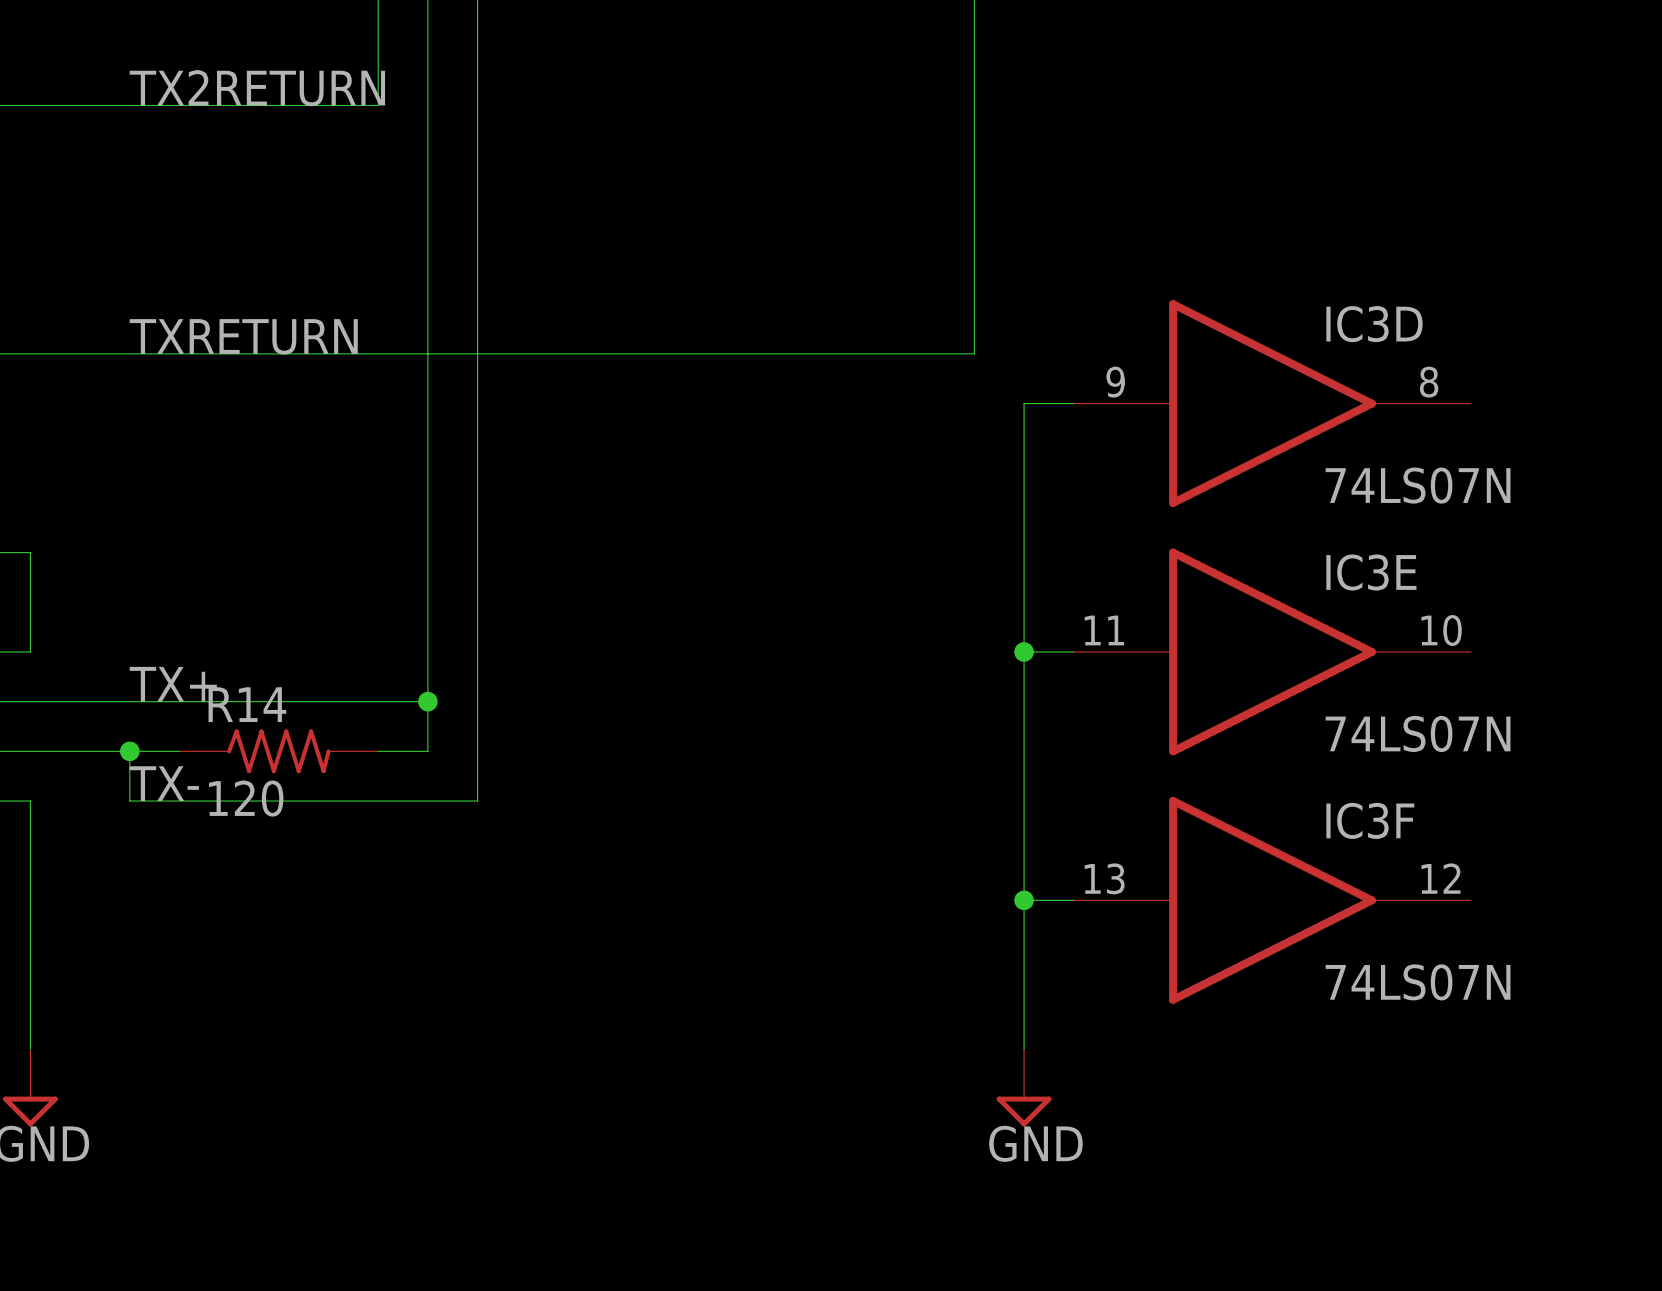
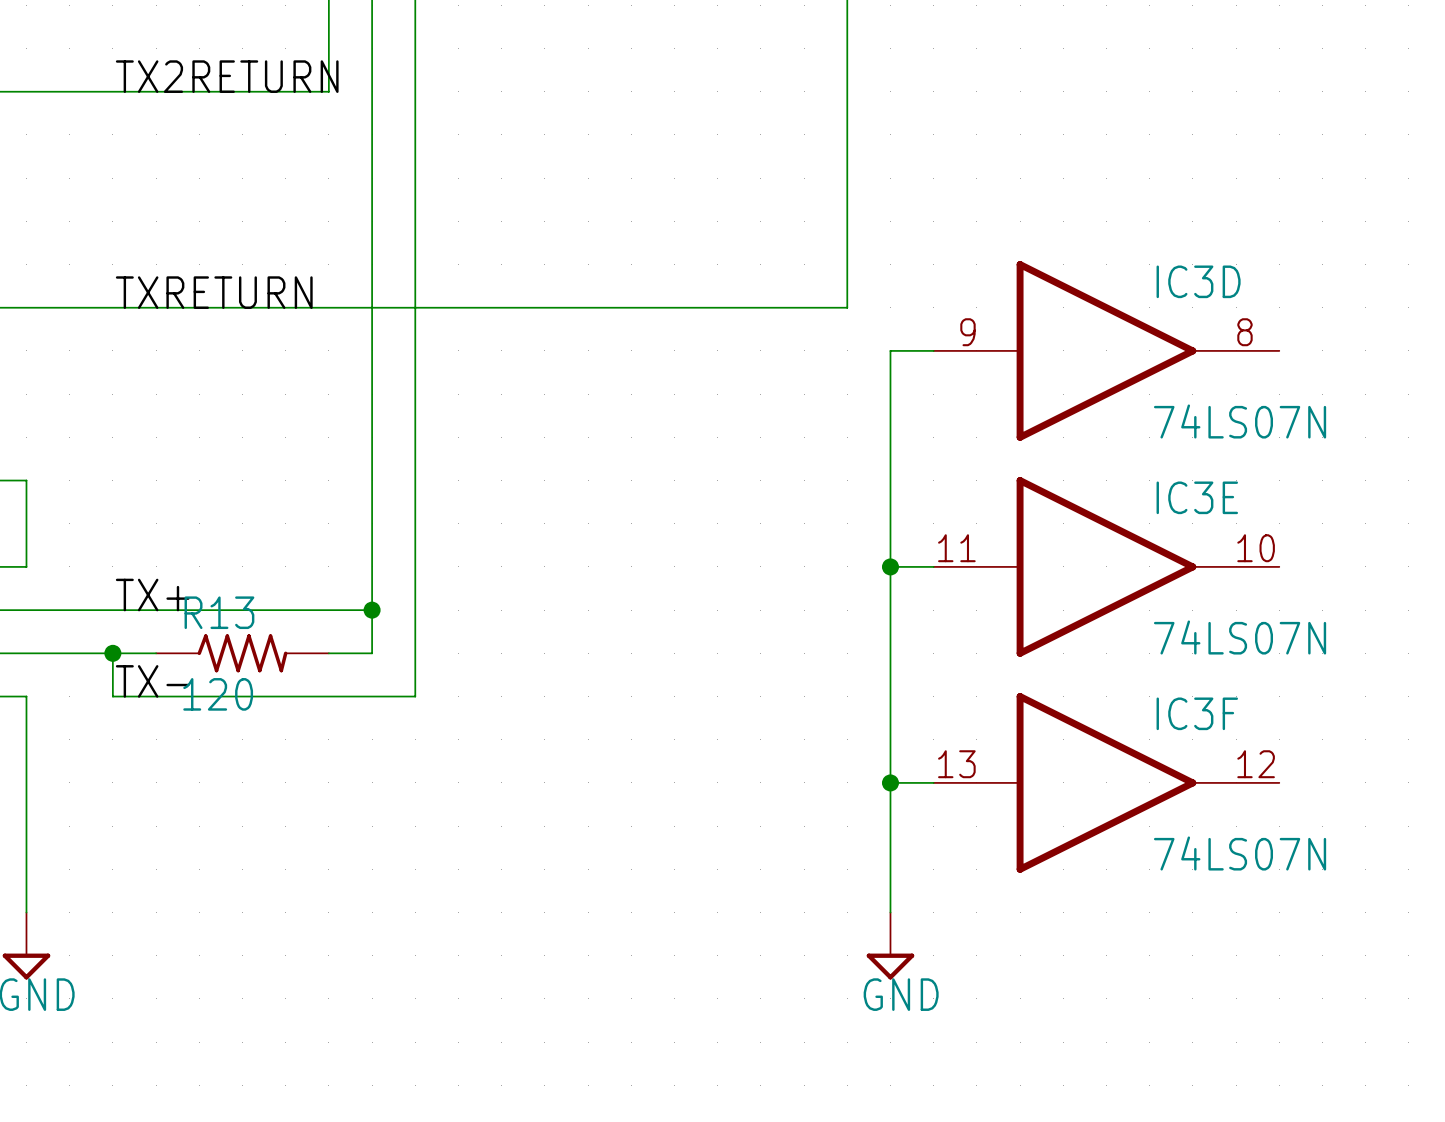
R14 name: R14 (247, 704) -> R13 (219, 612)

